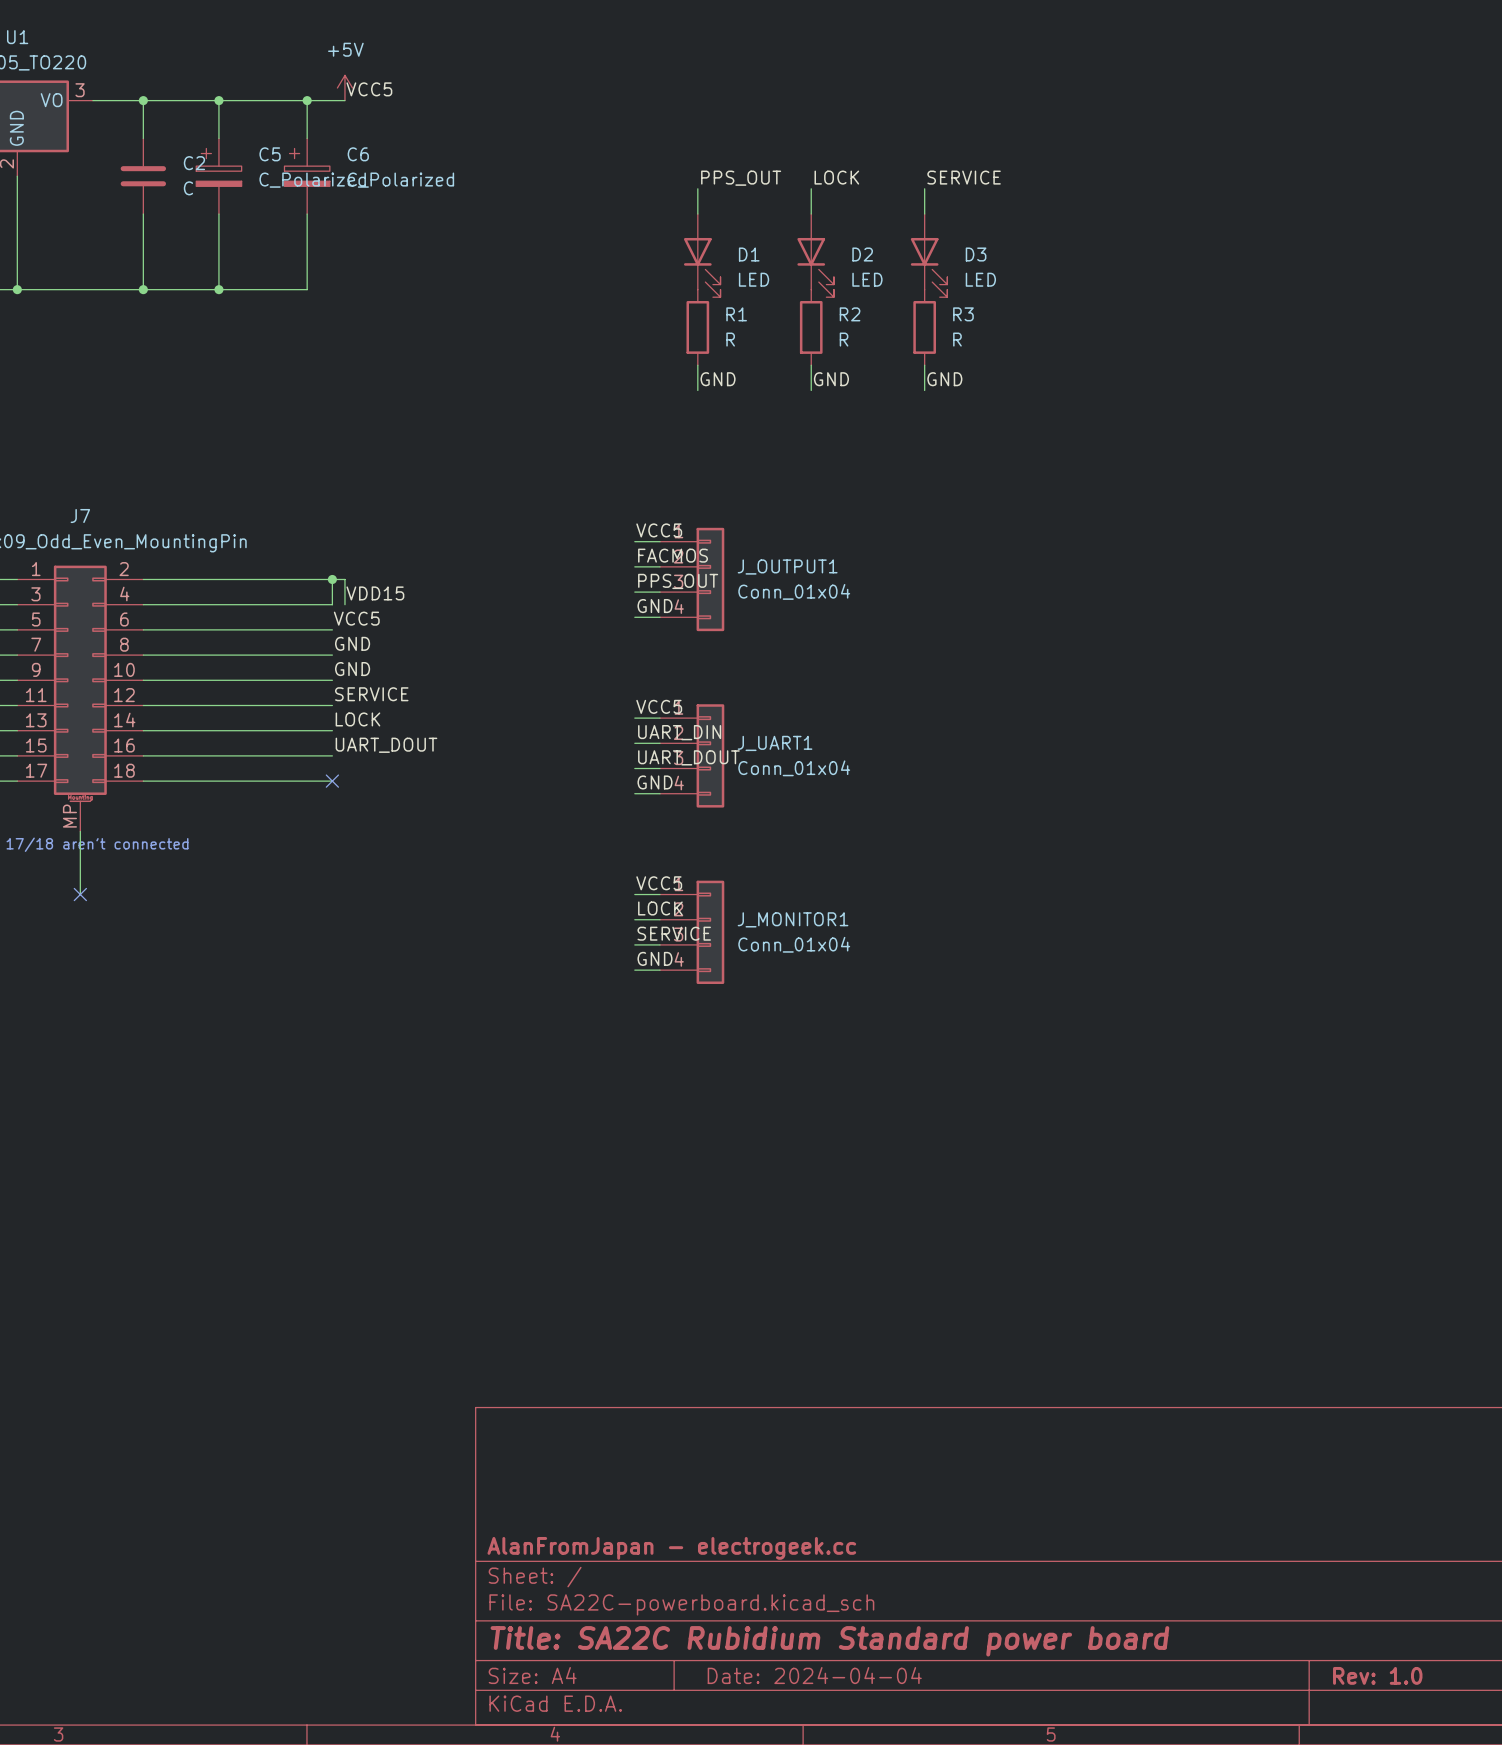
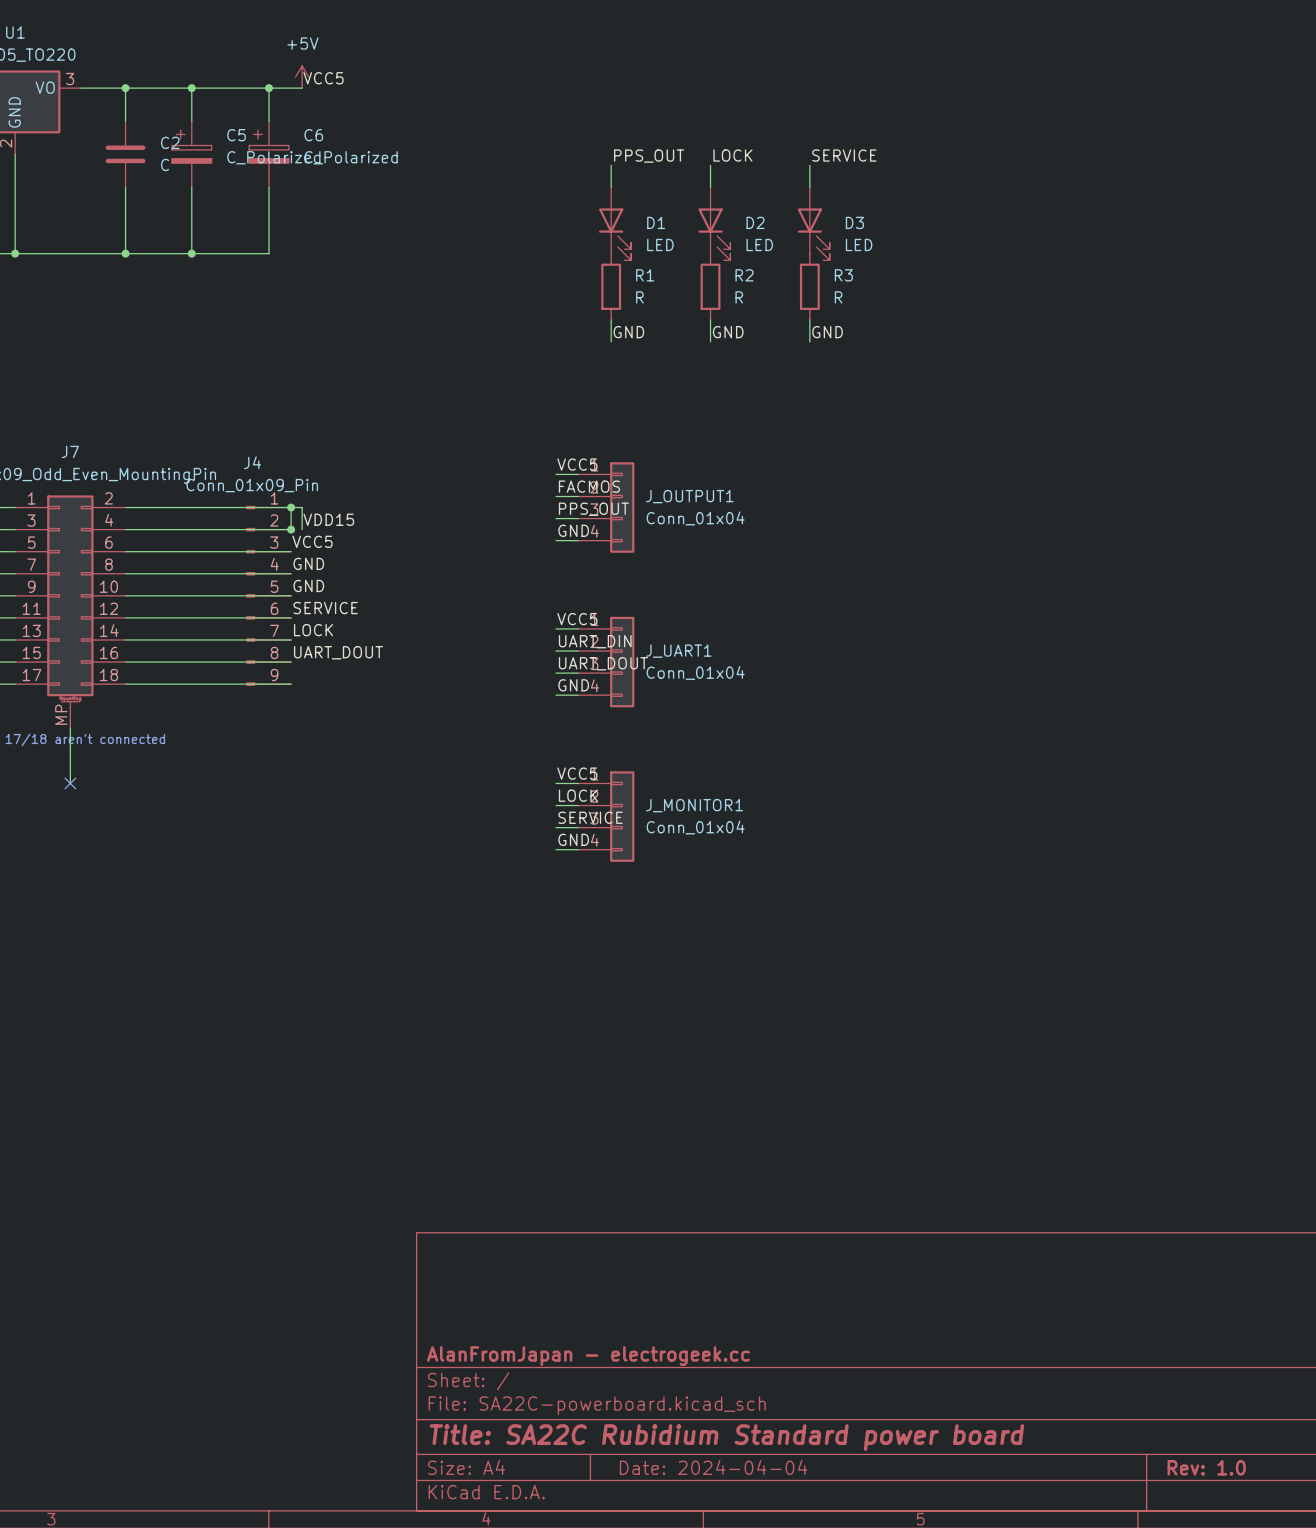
junction: none -> (291, 529)
J4: none -> Conn_01x09_Pin (268, 595)
no-connect mark: (332, 781) -> none

